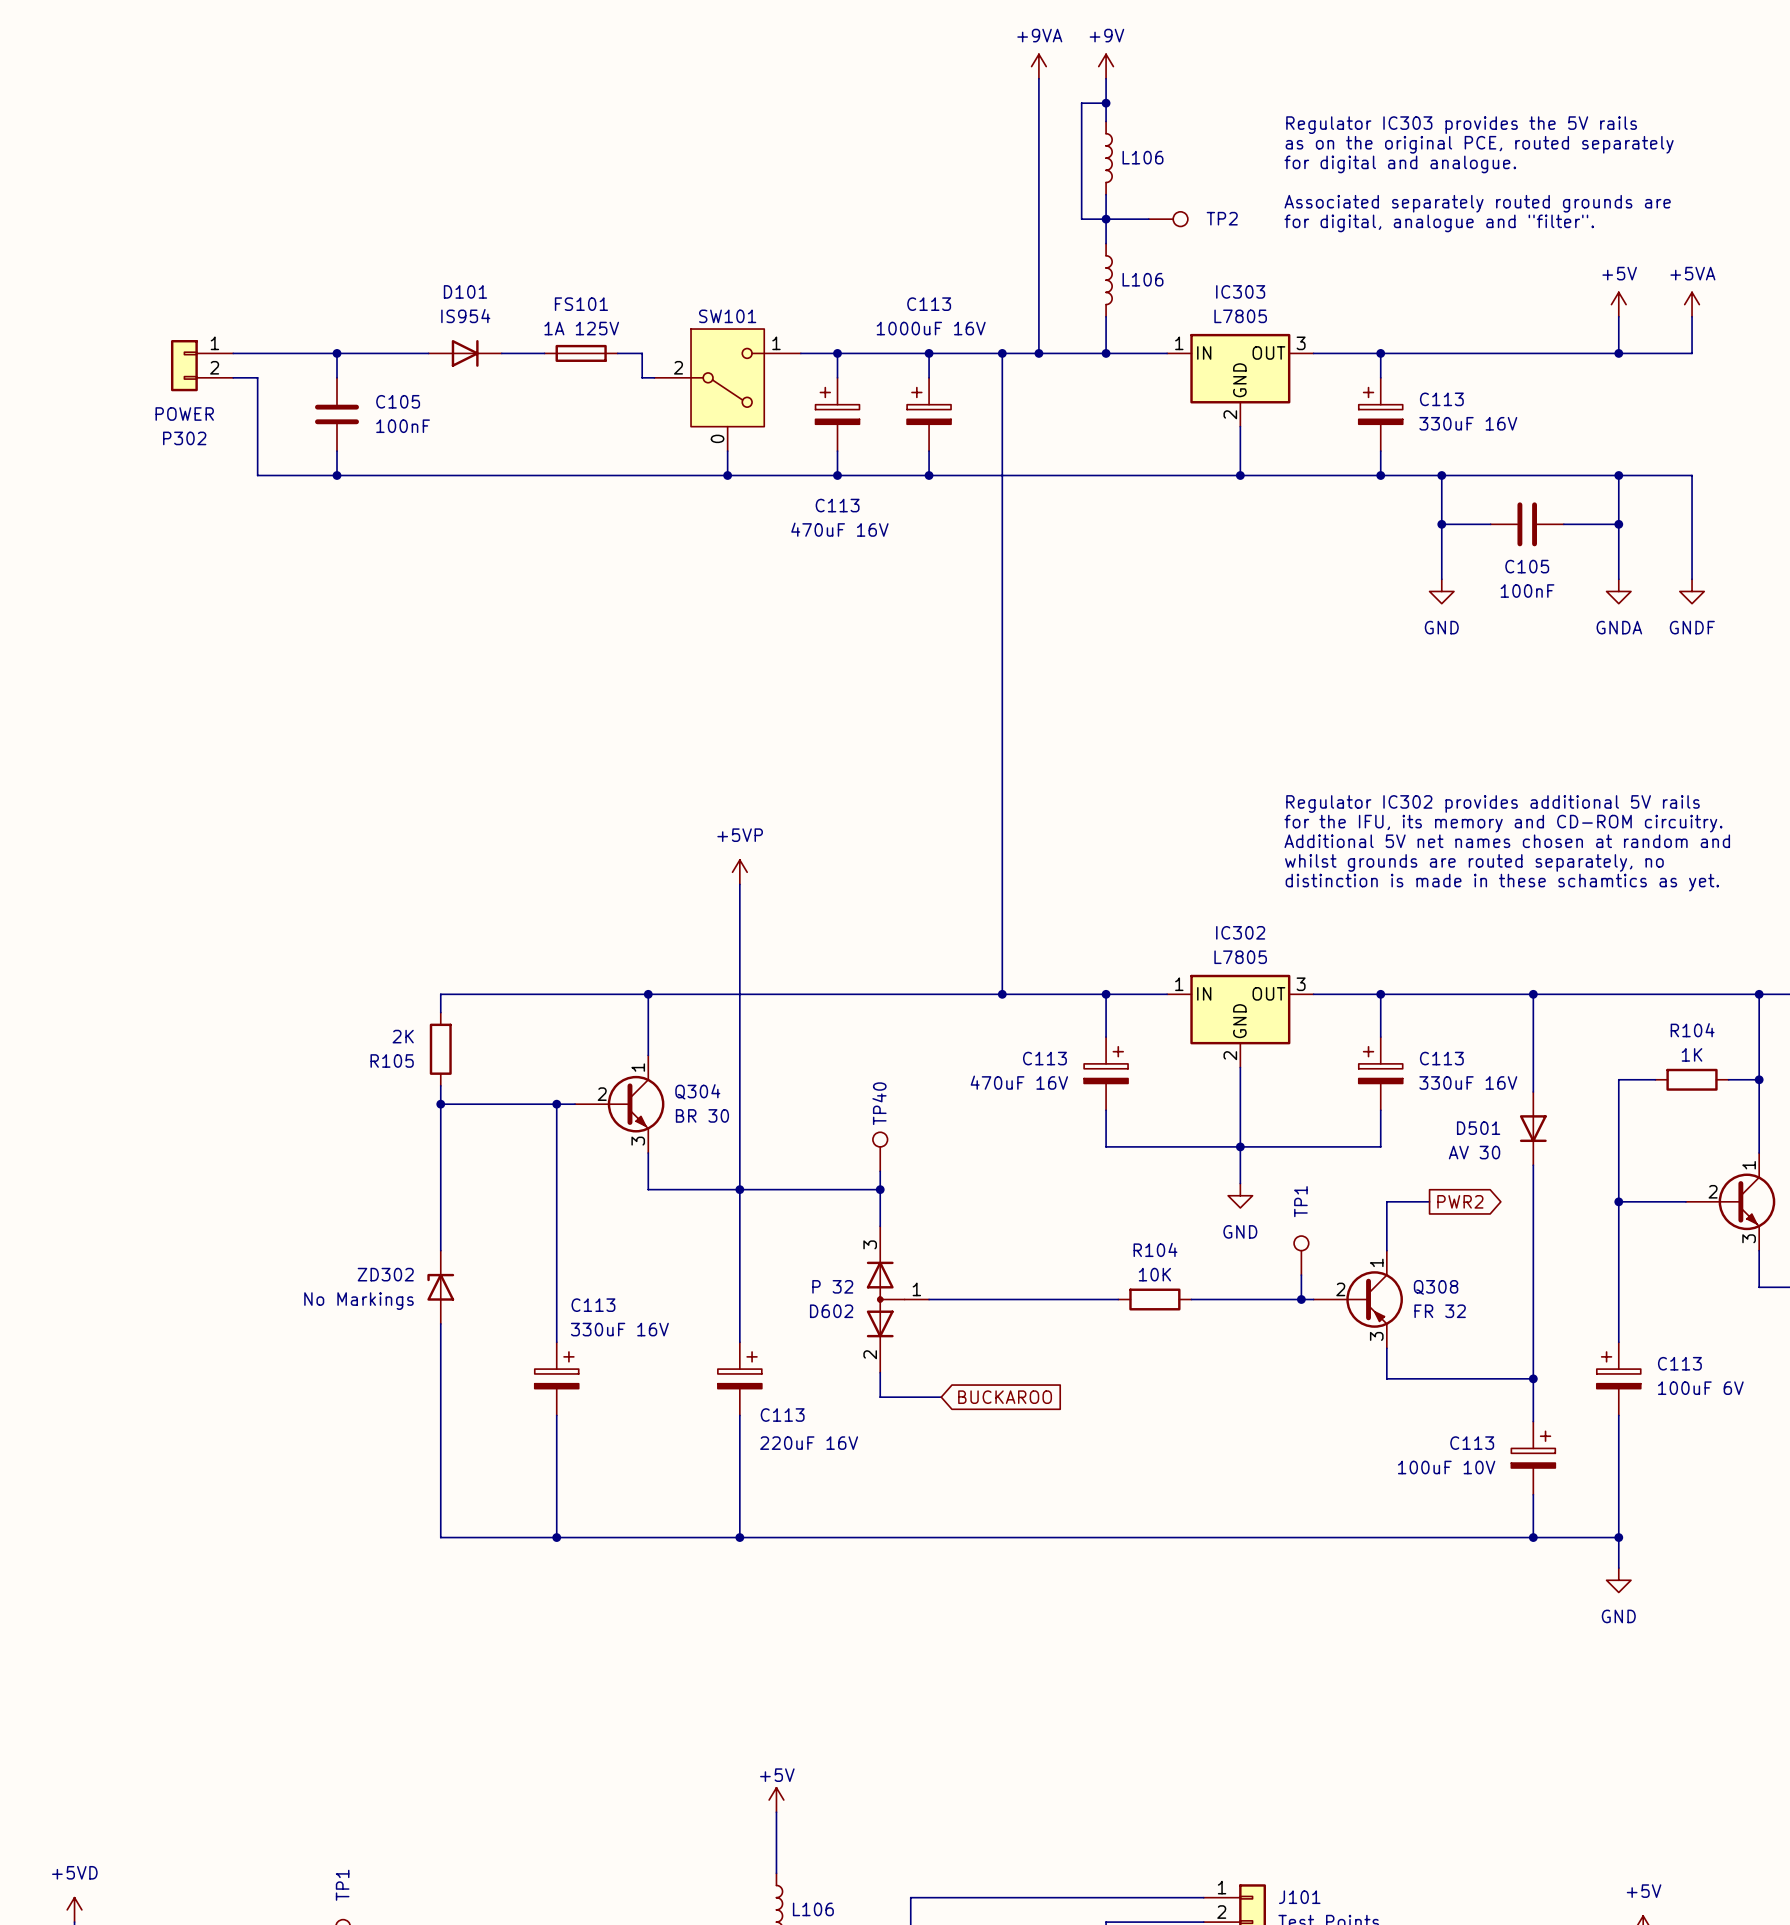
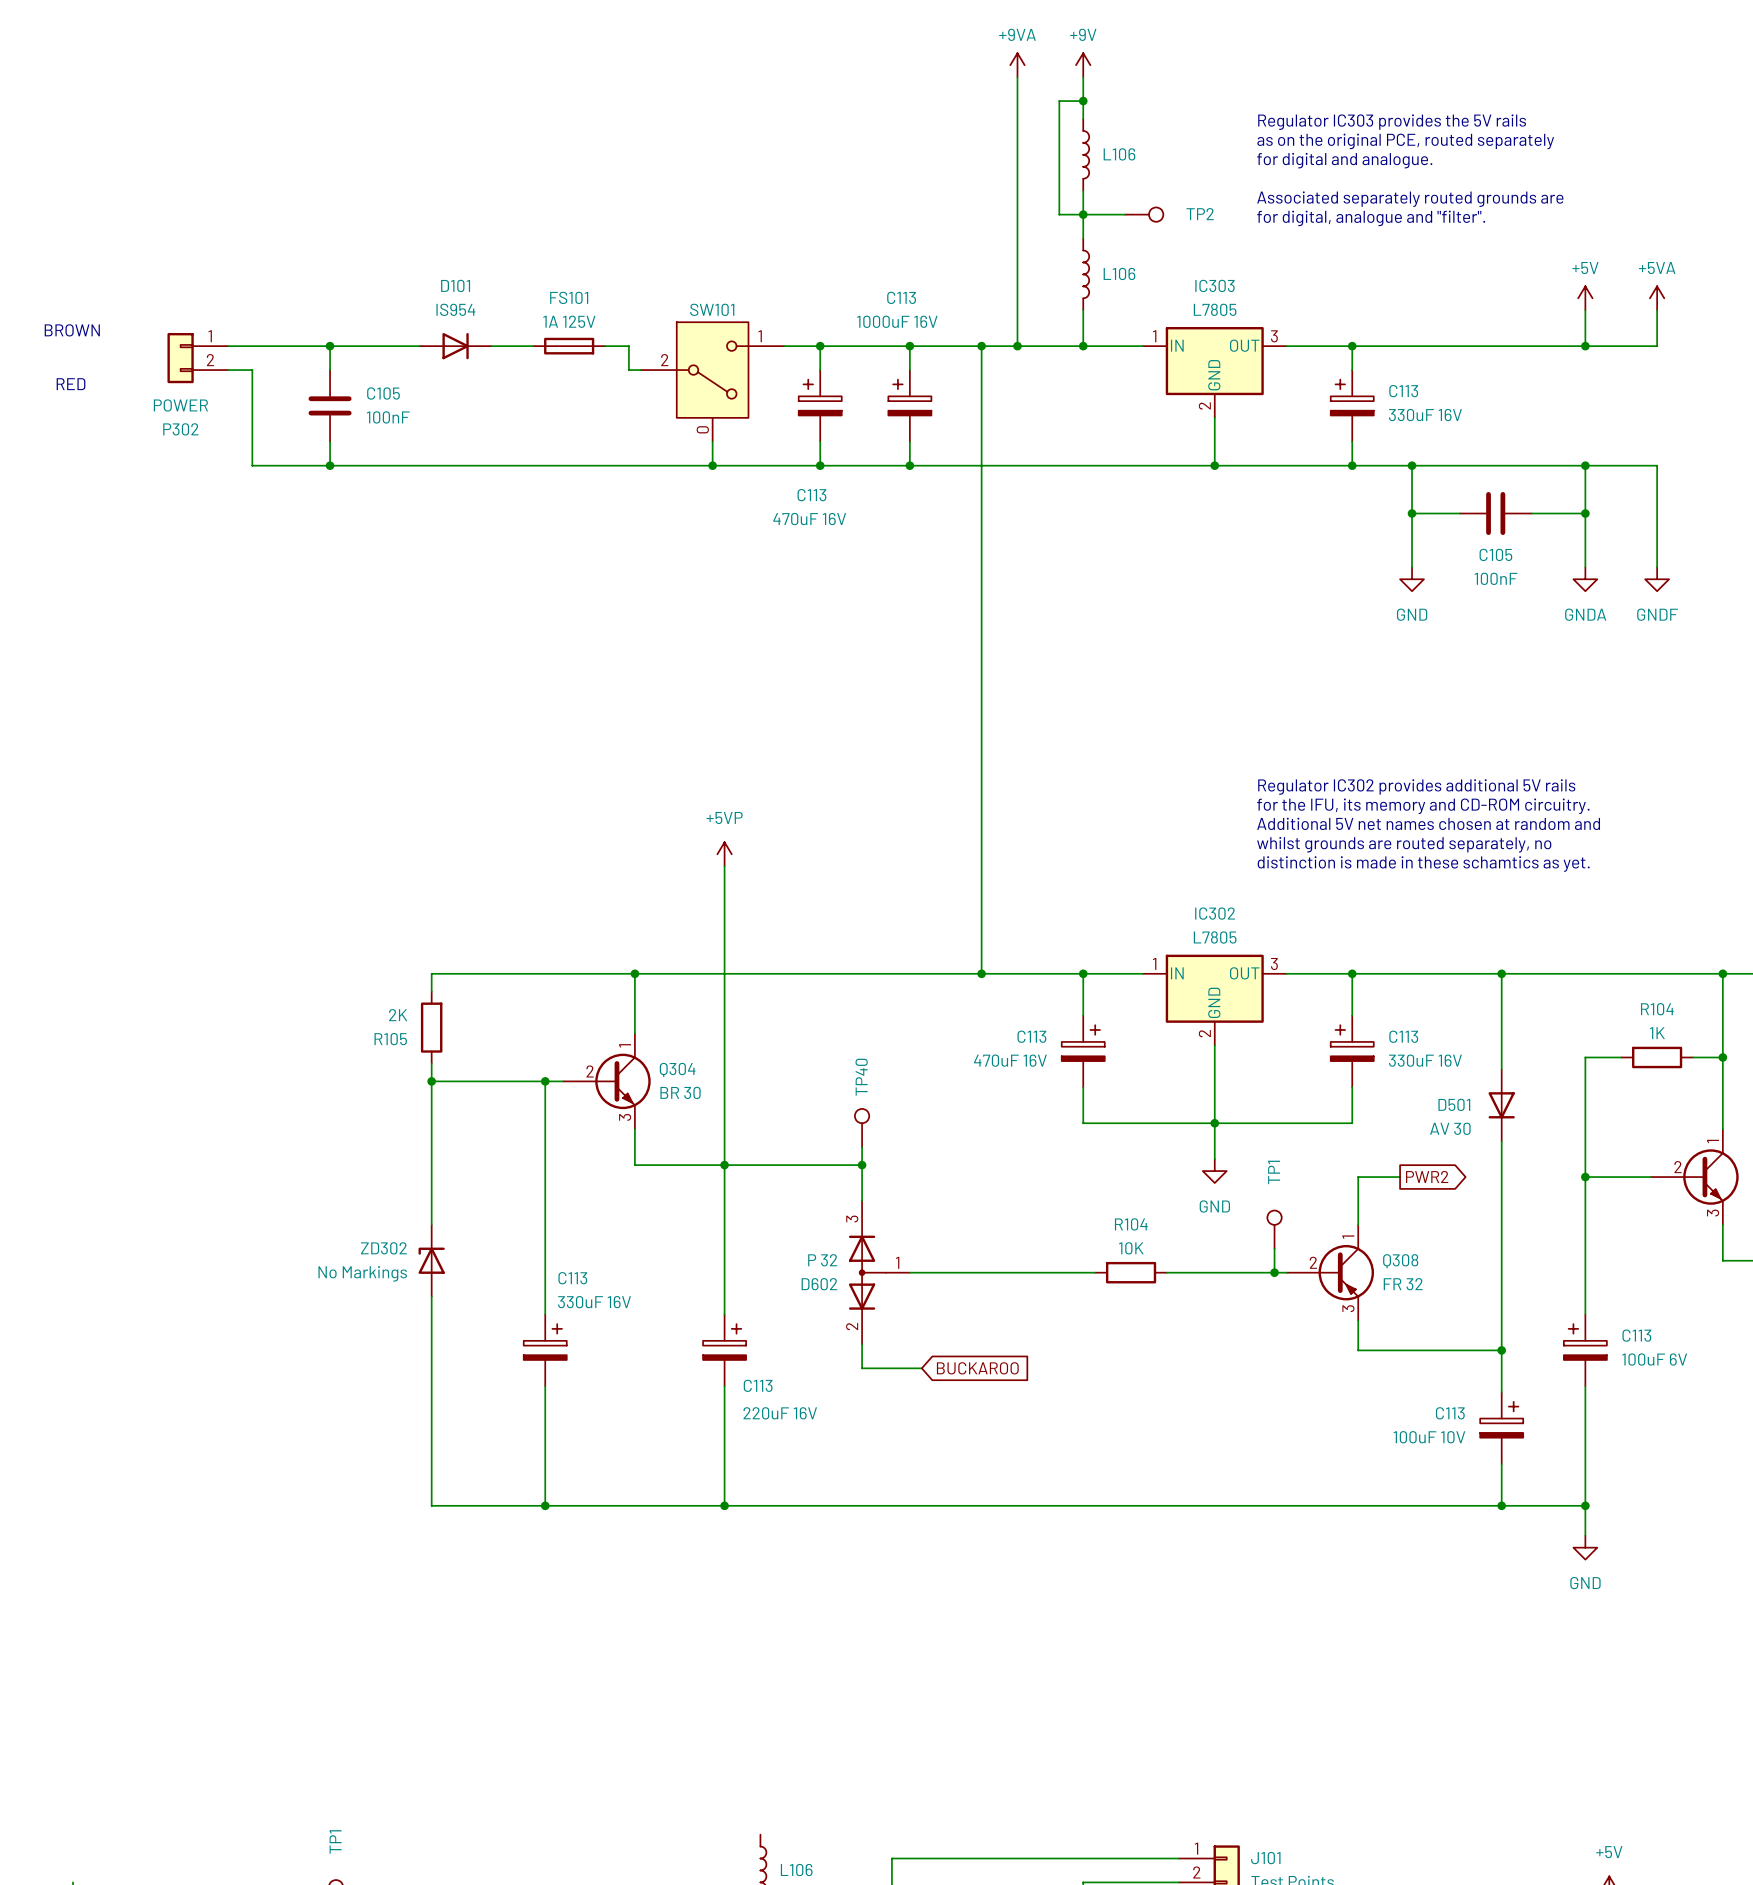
text: none -> BROWN (72, 330)
text: none -> RED (71, 384)
power symbol: +5V (776, 1800) -> none
wire: (776, 1812) (776, 1873) -> none
power symbol: +5VD (74, 1909) -> none

